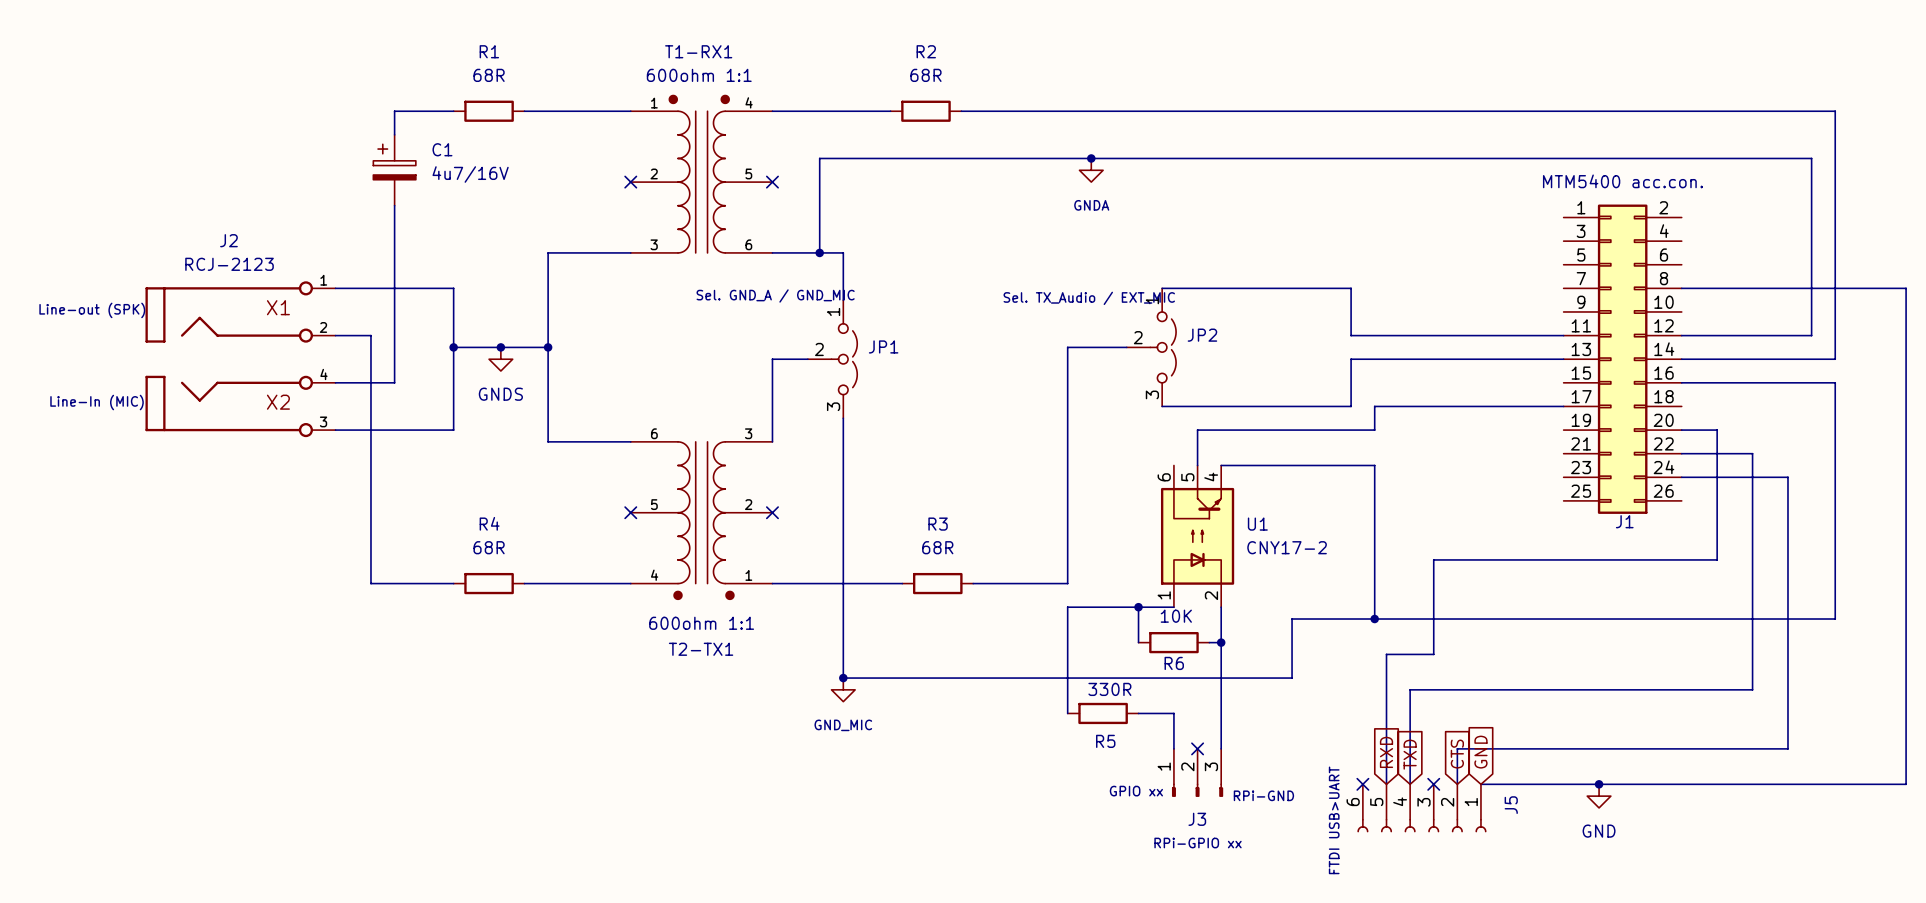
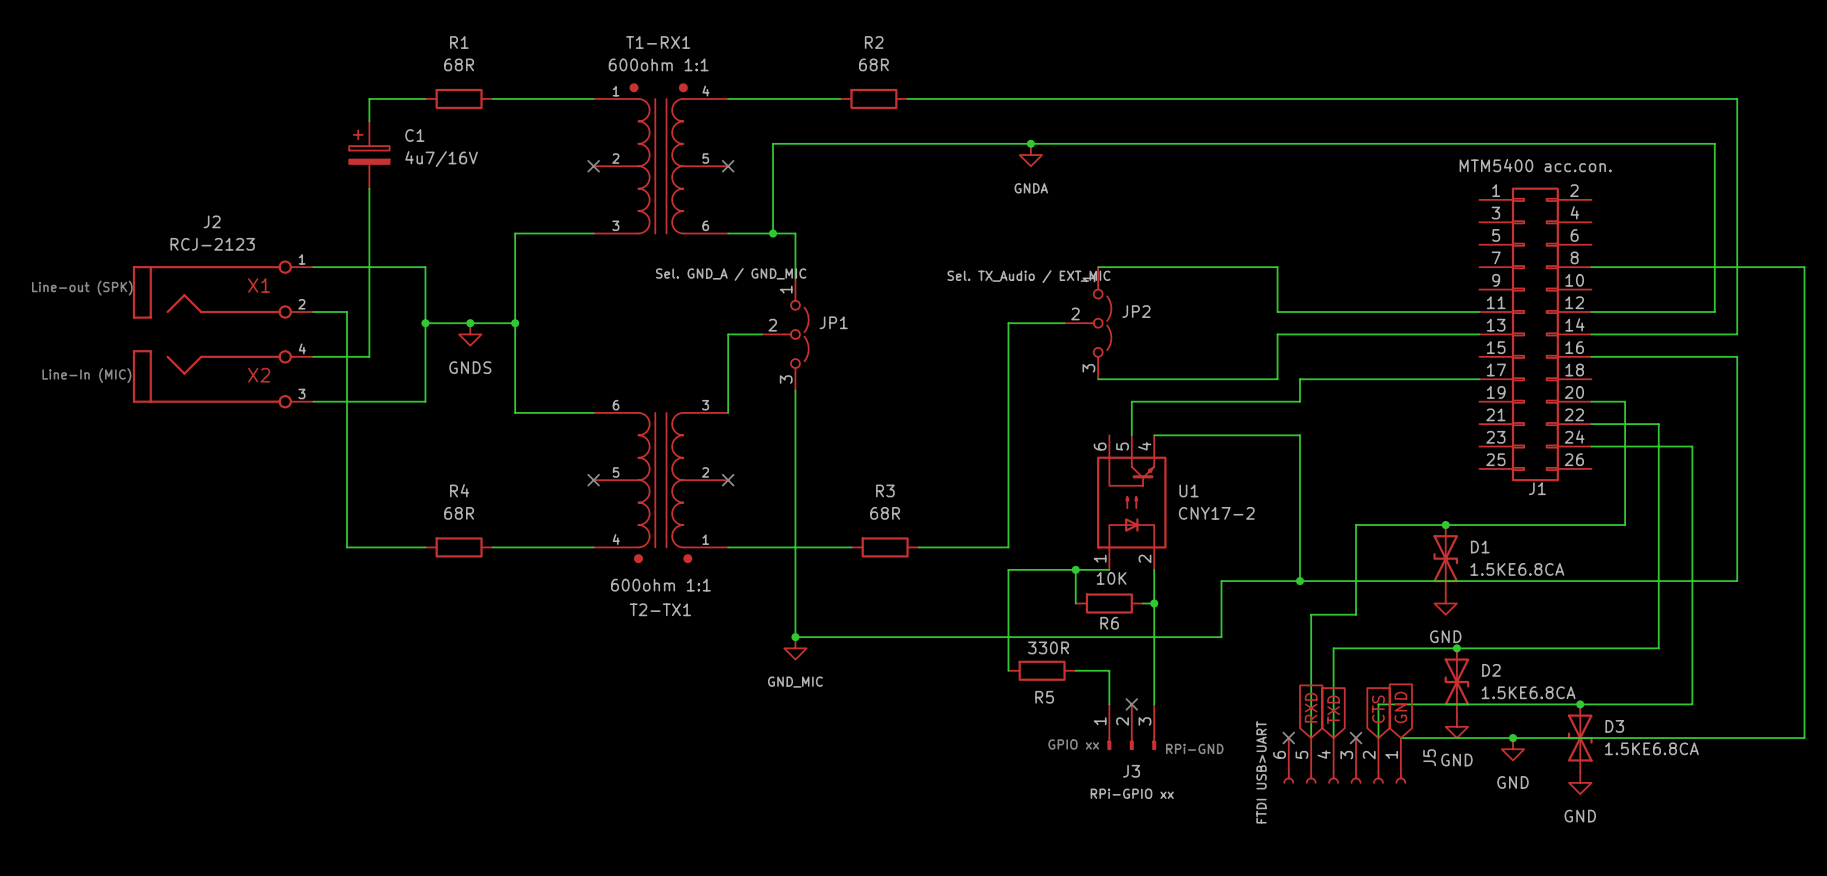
junction: none -> (1445, 525)
D1: none -> 1.5KE6.8CA (1445, 558)
power symbol: none -> GND (1445, 603)
junction: none -> (1456, 648)
D2: none -> 1.5KE6.8CA (1456, 681)
junction: none -> (1580, 704)
power symbol: none -> GND (1456, 726)
D3: none -> 1.5KE6.8CA (1580, 738)
power symbol: none -> GND (1580, 782)

